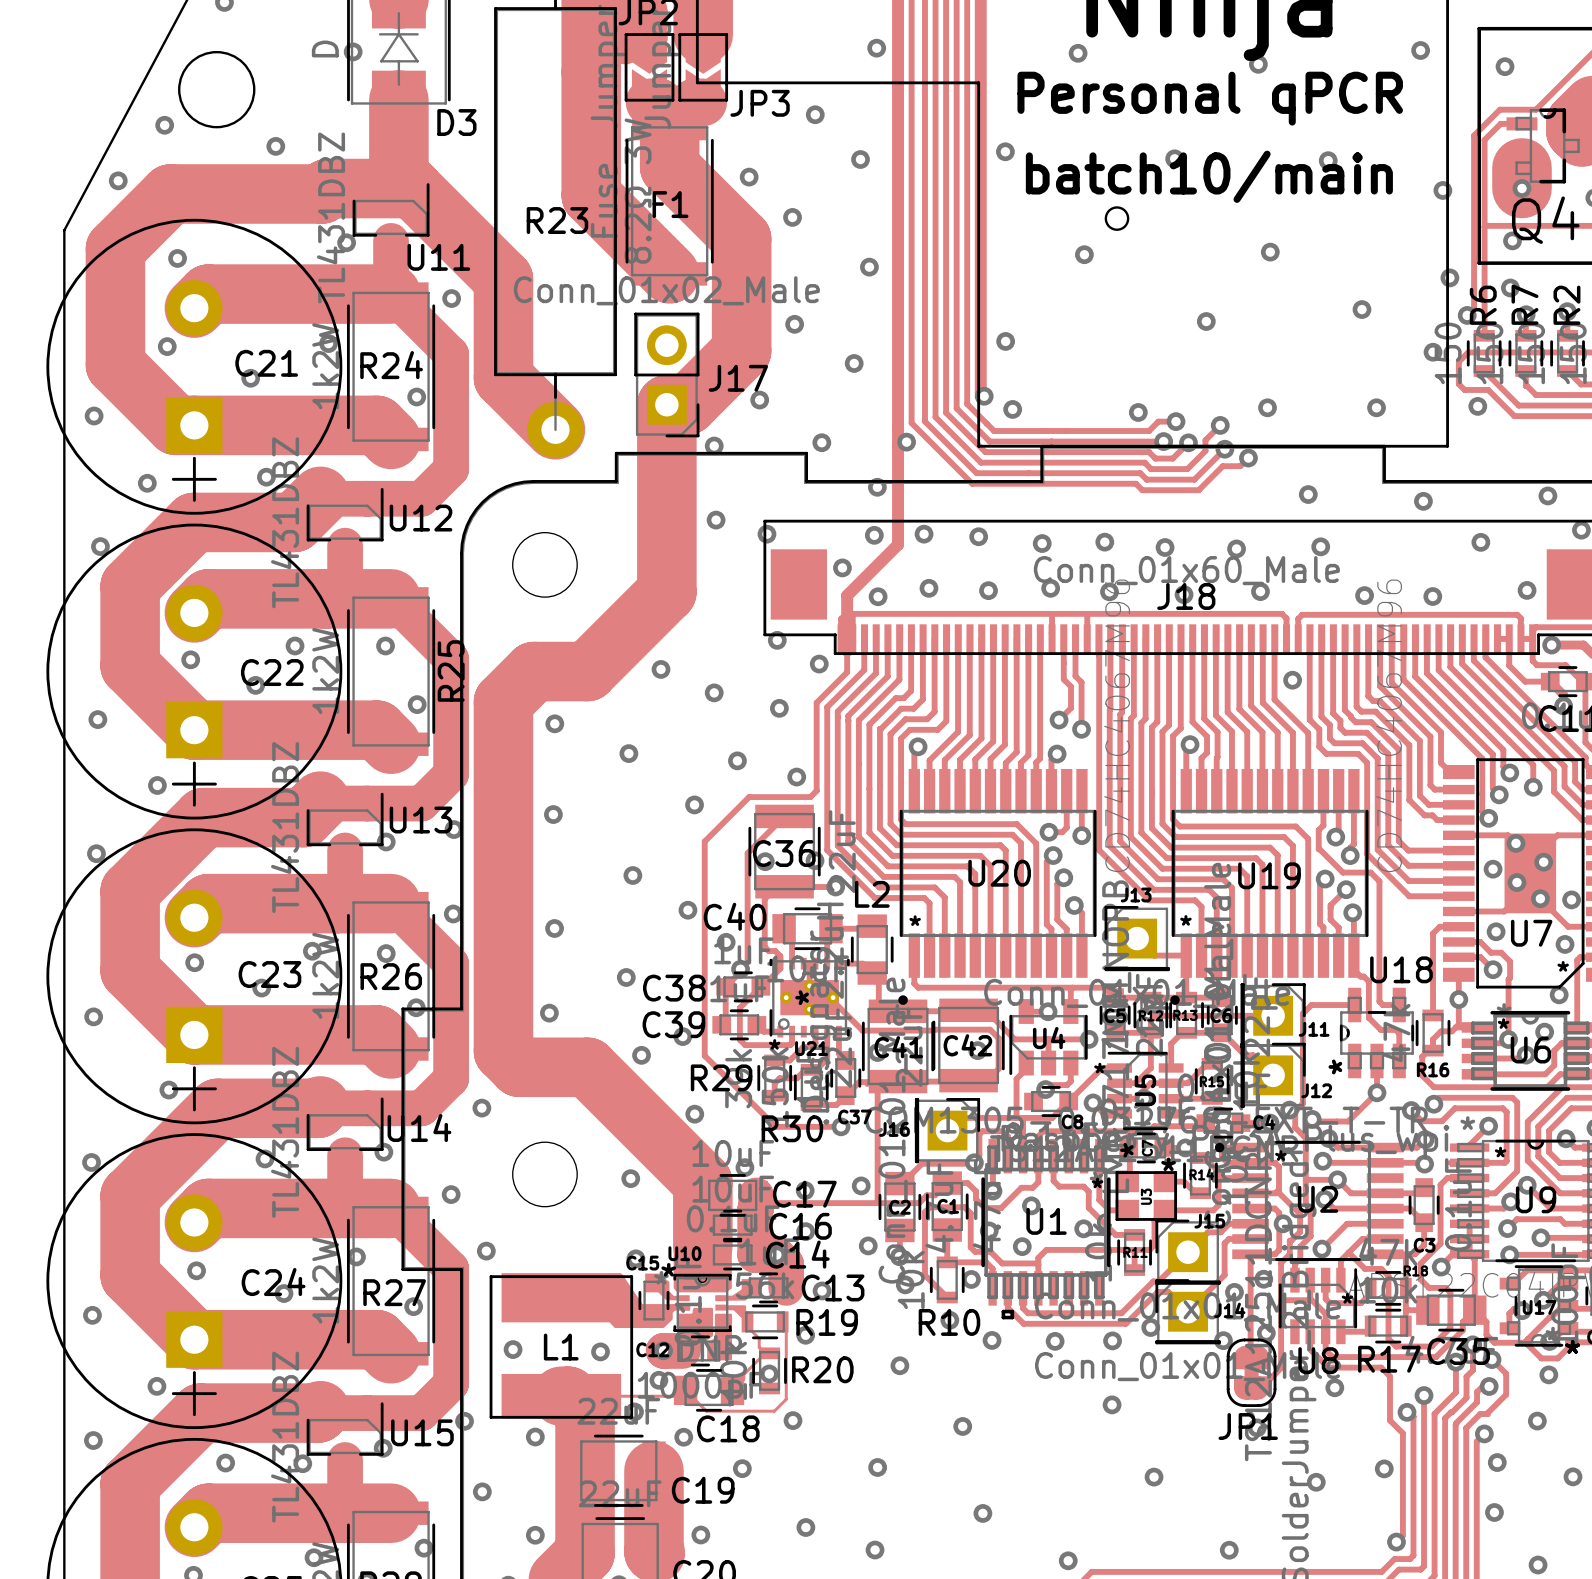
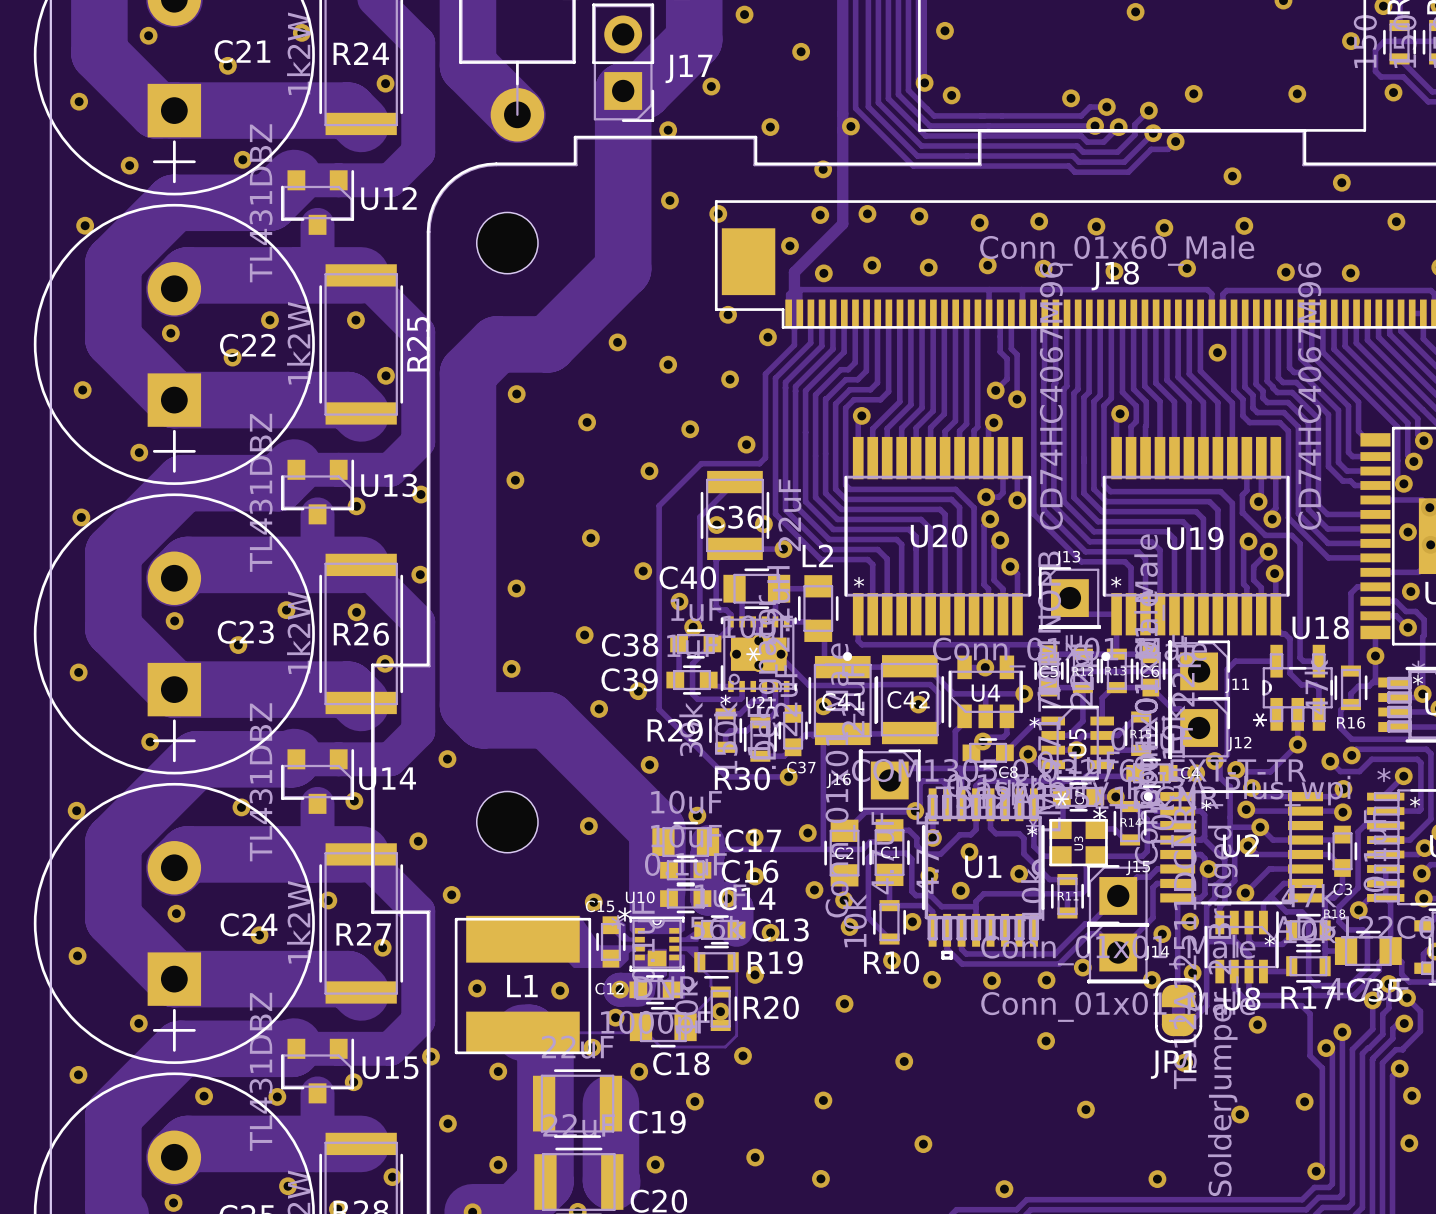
U21 footprint: [769, 957, 850, 1038] -> [720, 616, 797, 693]

